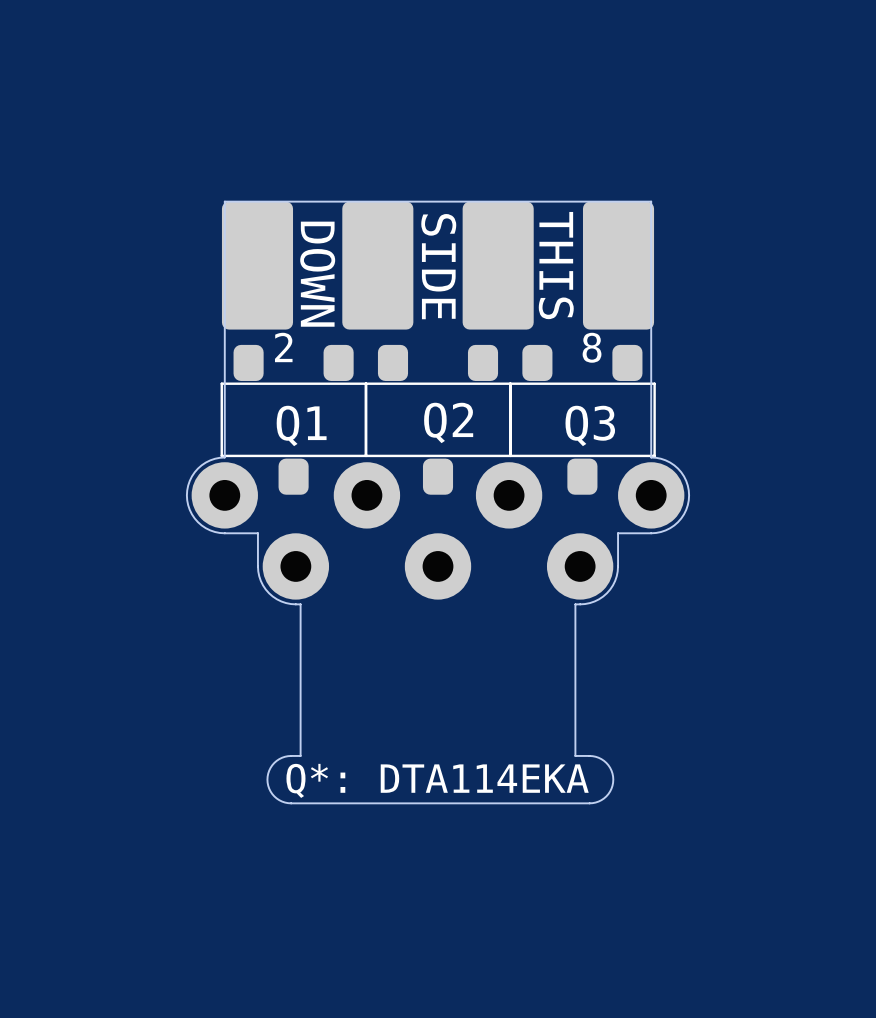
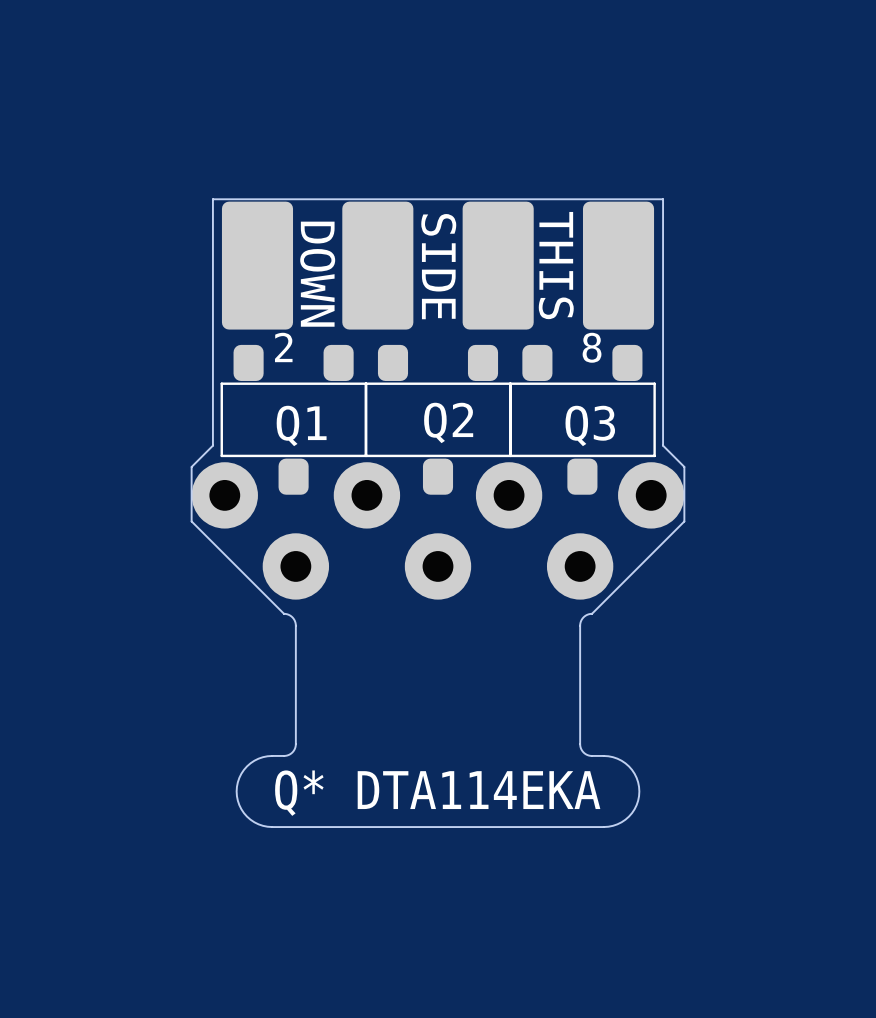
board edge: (651, 201) (651, 457) (665, 460) (681, 472) (687, 485) (688, 500) (681, 518) (665, 530) (651, 533) (618, 533) (617, 571) (612, 585) (599, 599) (589, 603) (575, 604) (575, 755) (595, 756) (606, 762) (613, 776) (610, 791) (601, 800) (589, 803) (291, 803) (279, 800) (269, 788) (267, 779) (269, 770) (274, 762) (282, 757) (300, 755) (300, 604) (286, 603) (276, 599) (263, 585) (258, 571) (257, 533) (224, 533) (210, 530) (194, 518) (187, 500) (188, 485) (194, 472) (210, 460) (224, 457) (224, 201) (651, 201) -> (663, 199) (663, 445) (684, 466) (684, 521) (591, 613) (583, 617) (580, 625) (580, 747) (587, 755) (613, 757) (625, 763) (632, 769) (636, 777) (639, 791) (634, 809) (621, 822) (603, 827) (272, 827) (254, 822) (243, 813) (237, 800) (236, 786) (241, 773) (247, 766) (258, 758) (287, 755) (292, 752) (295, 747) (295, 624) (292, 617) (284, 613) (191, 521) (191, 466) (212, 445) (212, 199) (663, 199)
text: Q*: DTA114EKA (437, 780) -> Q* DTA114EKA (437, 793)

